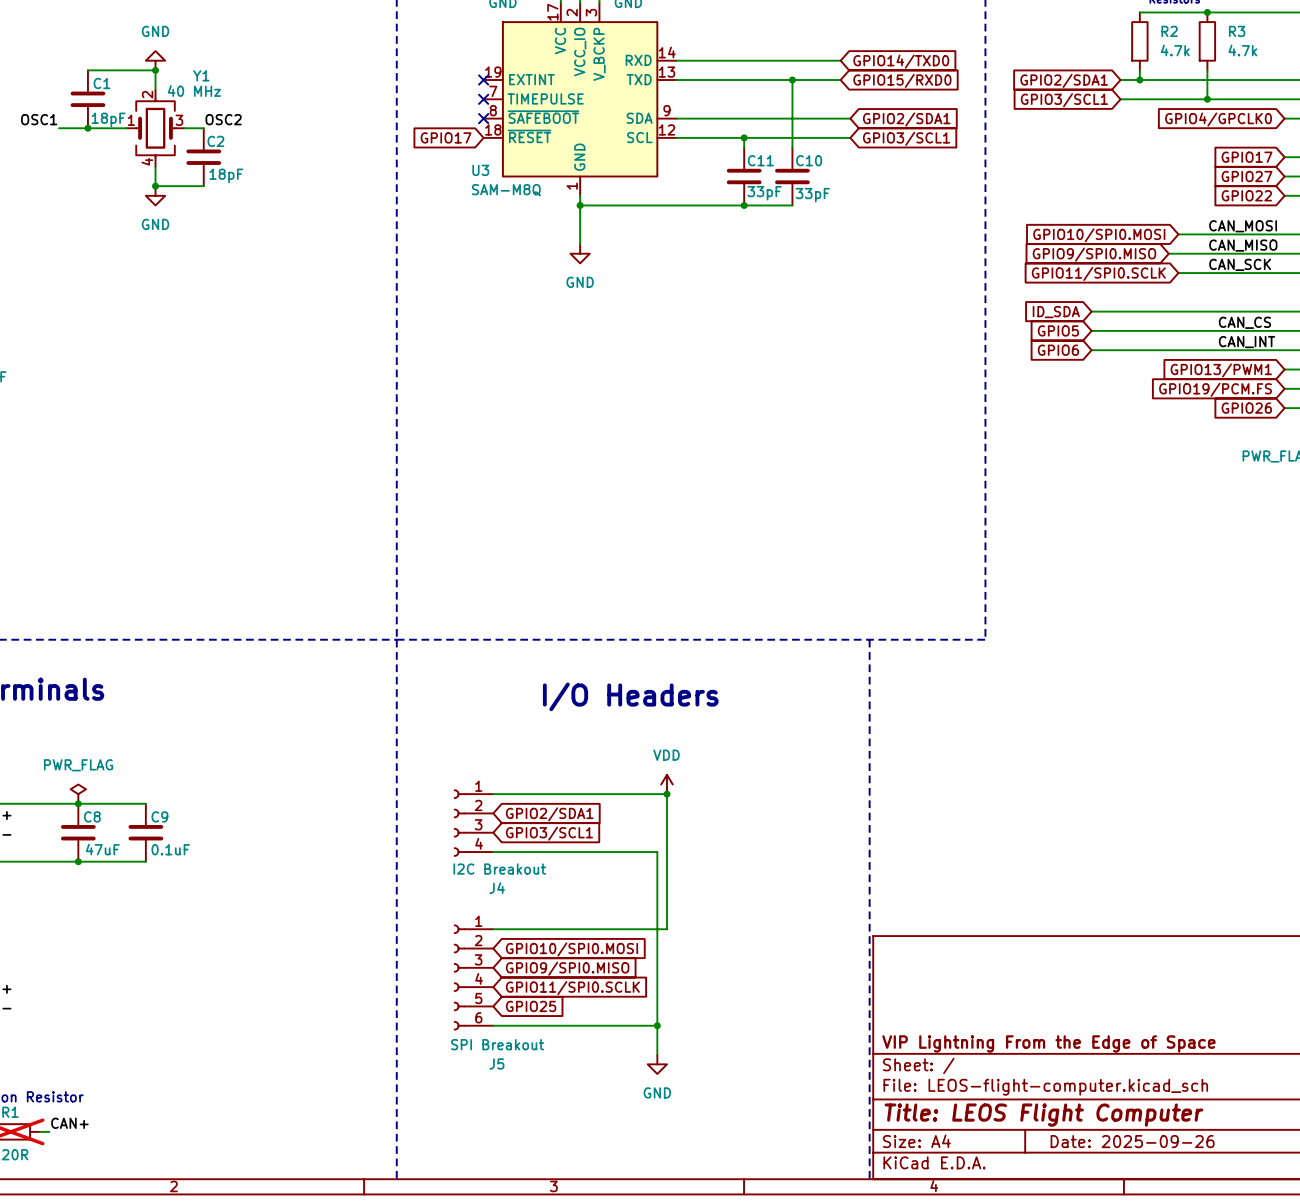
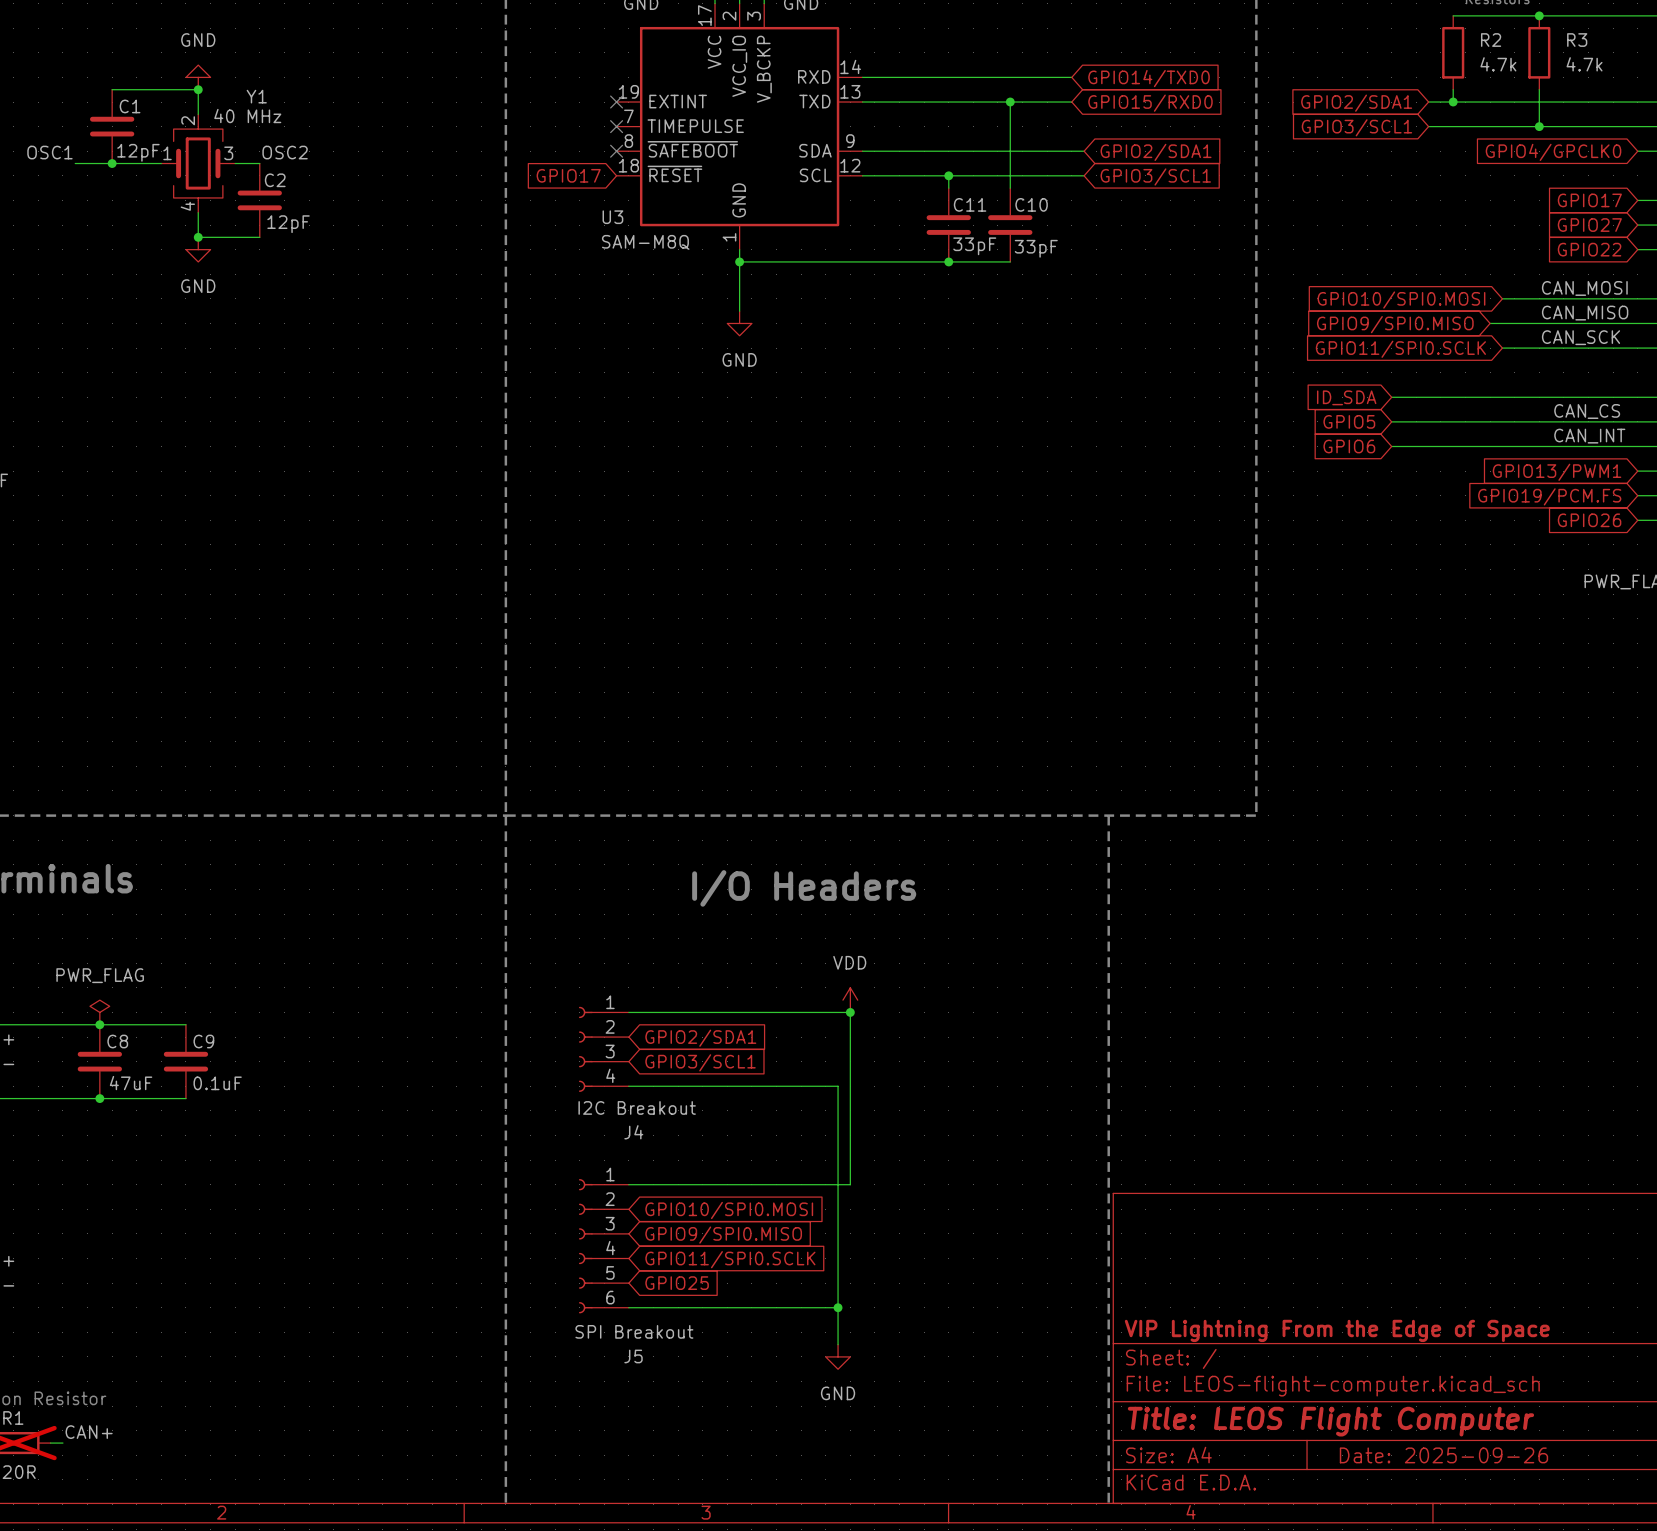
C1 value: 18pF (108, 119) -> 12pF (138, 152)
C2 value: 18pF (226, 175) -> 12pF (288, 224)

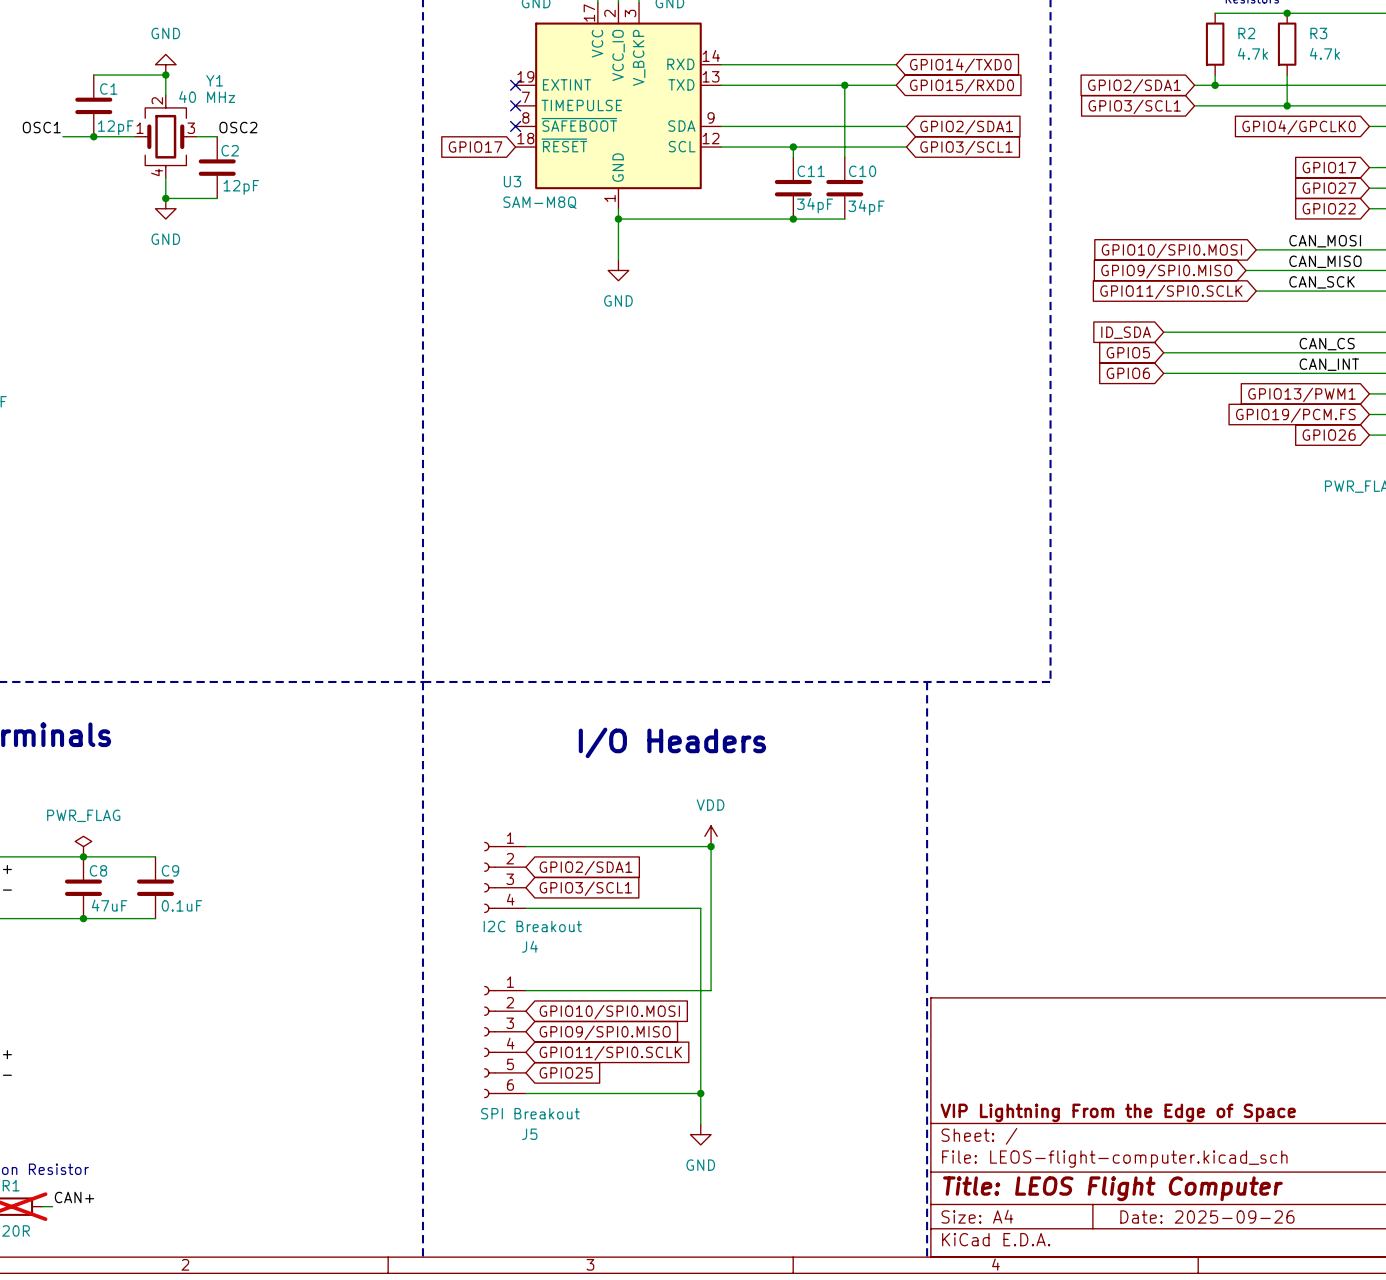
C11 value: 33pF (974, 246) -> 34pF (815, 205)
C10 value: 33pF (1036, 248) -> 34pF (866, 207)

